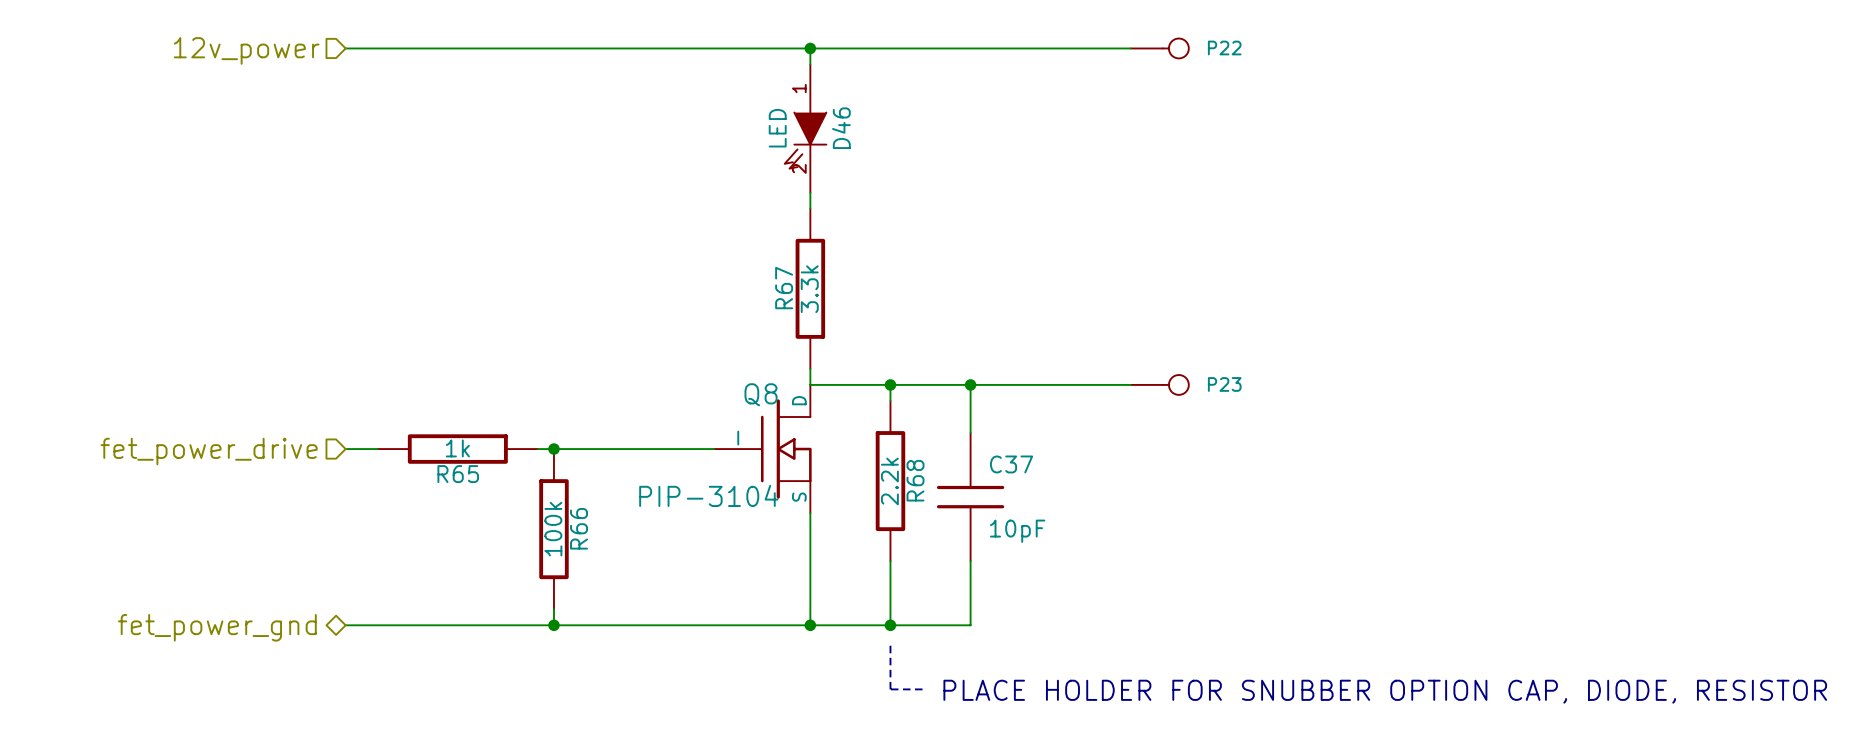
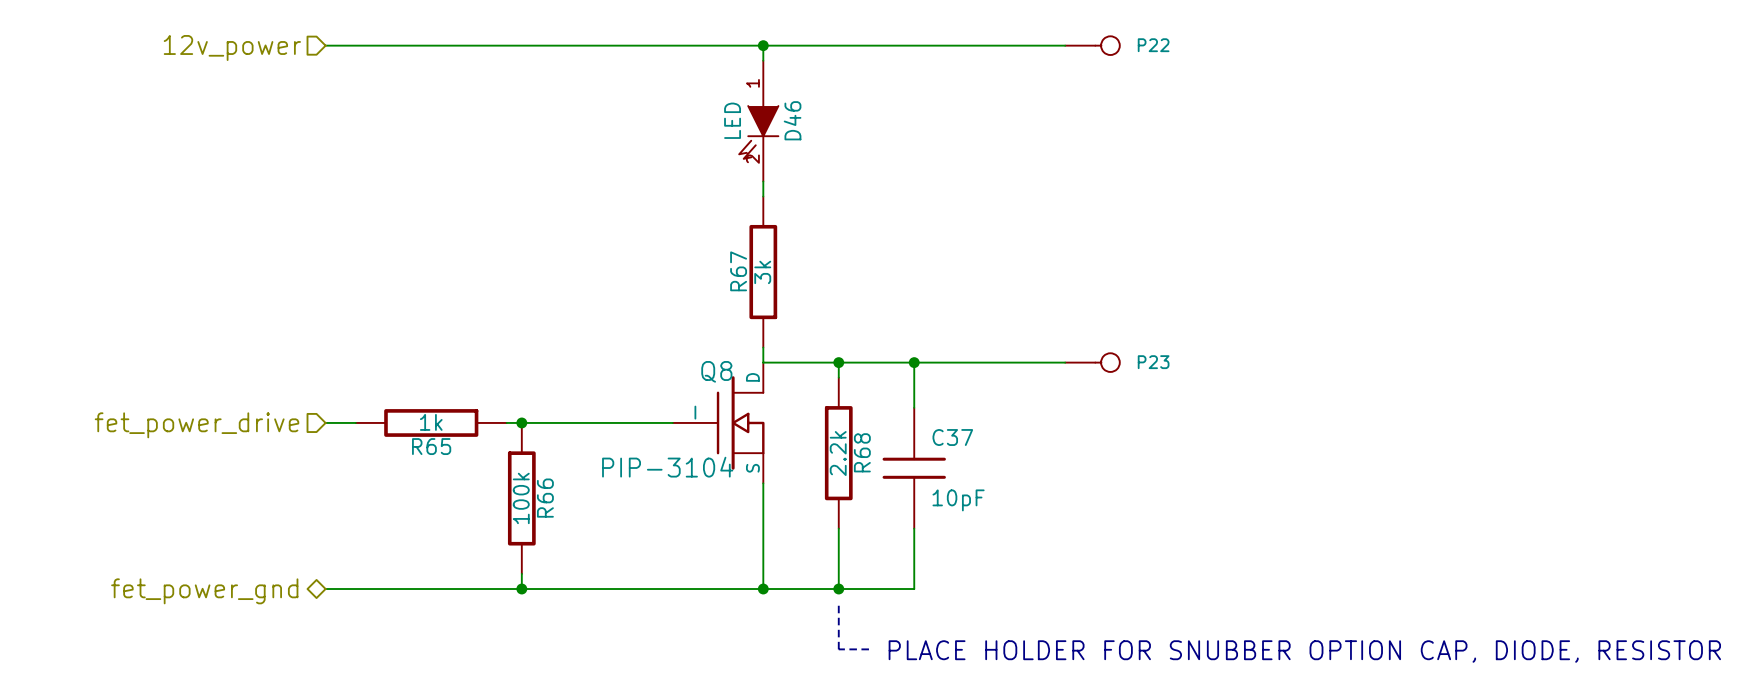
R67 value: 3.3k (809, 289) -> 3k (762, 272)

